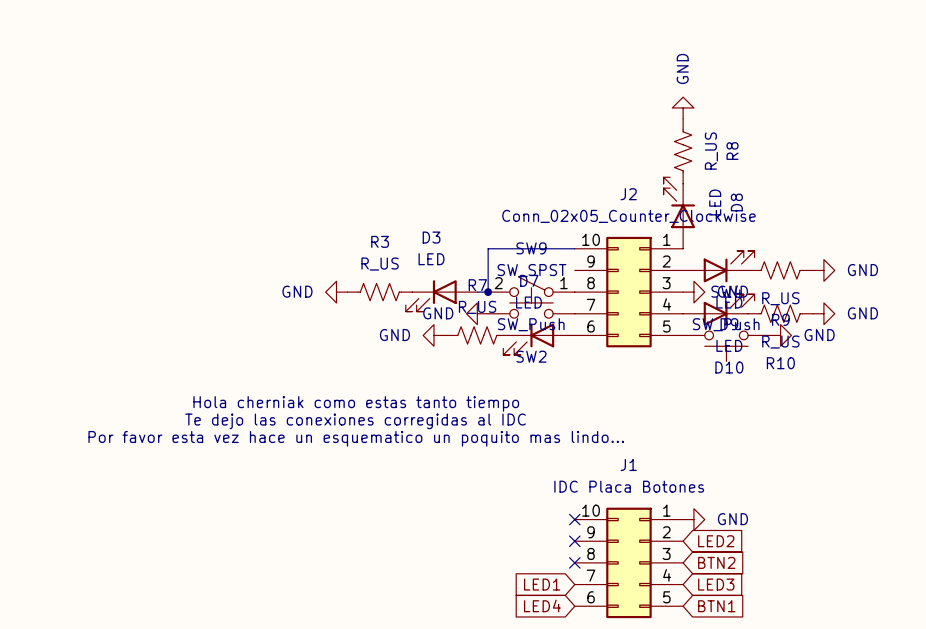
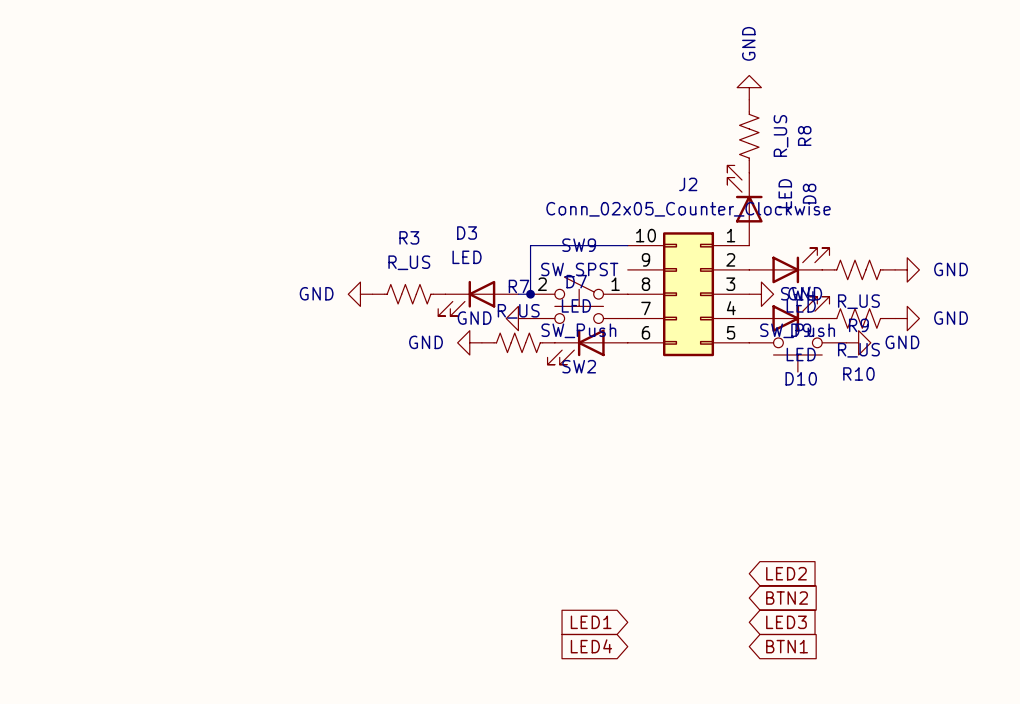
text: Hola cherniak como estas tanto tiempo (356, 403) -> none
text: Te dejo las conexiones corregidas al IDC (355, 421) -> none
text: Por favor esta vez hace un esquematico un poquito mas lindo... (356, 438) -> none
no-connect mark: (574, 519) -> none
power symbol: GND (693, 519) -> none
no-connect mark: (574, 541) -> none
no-connect mark: (574, 562) -> none
J1: IDC Placa Botones (628, 562) -> none

